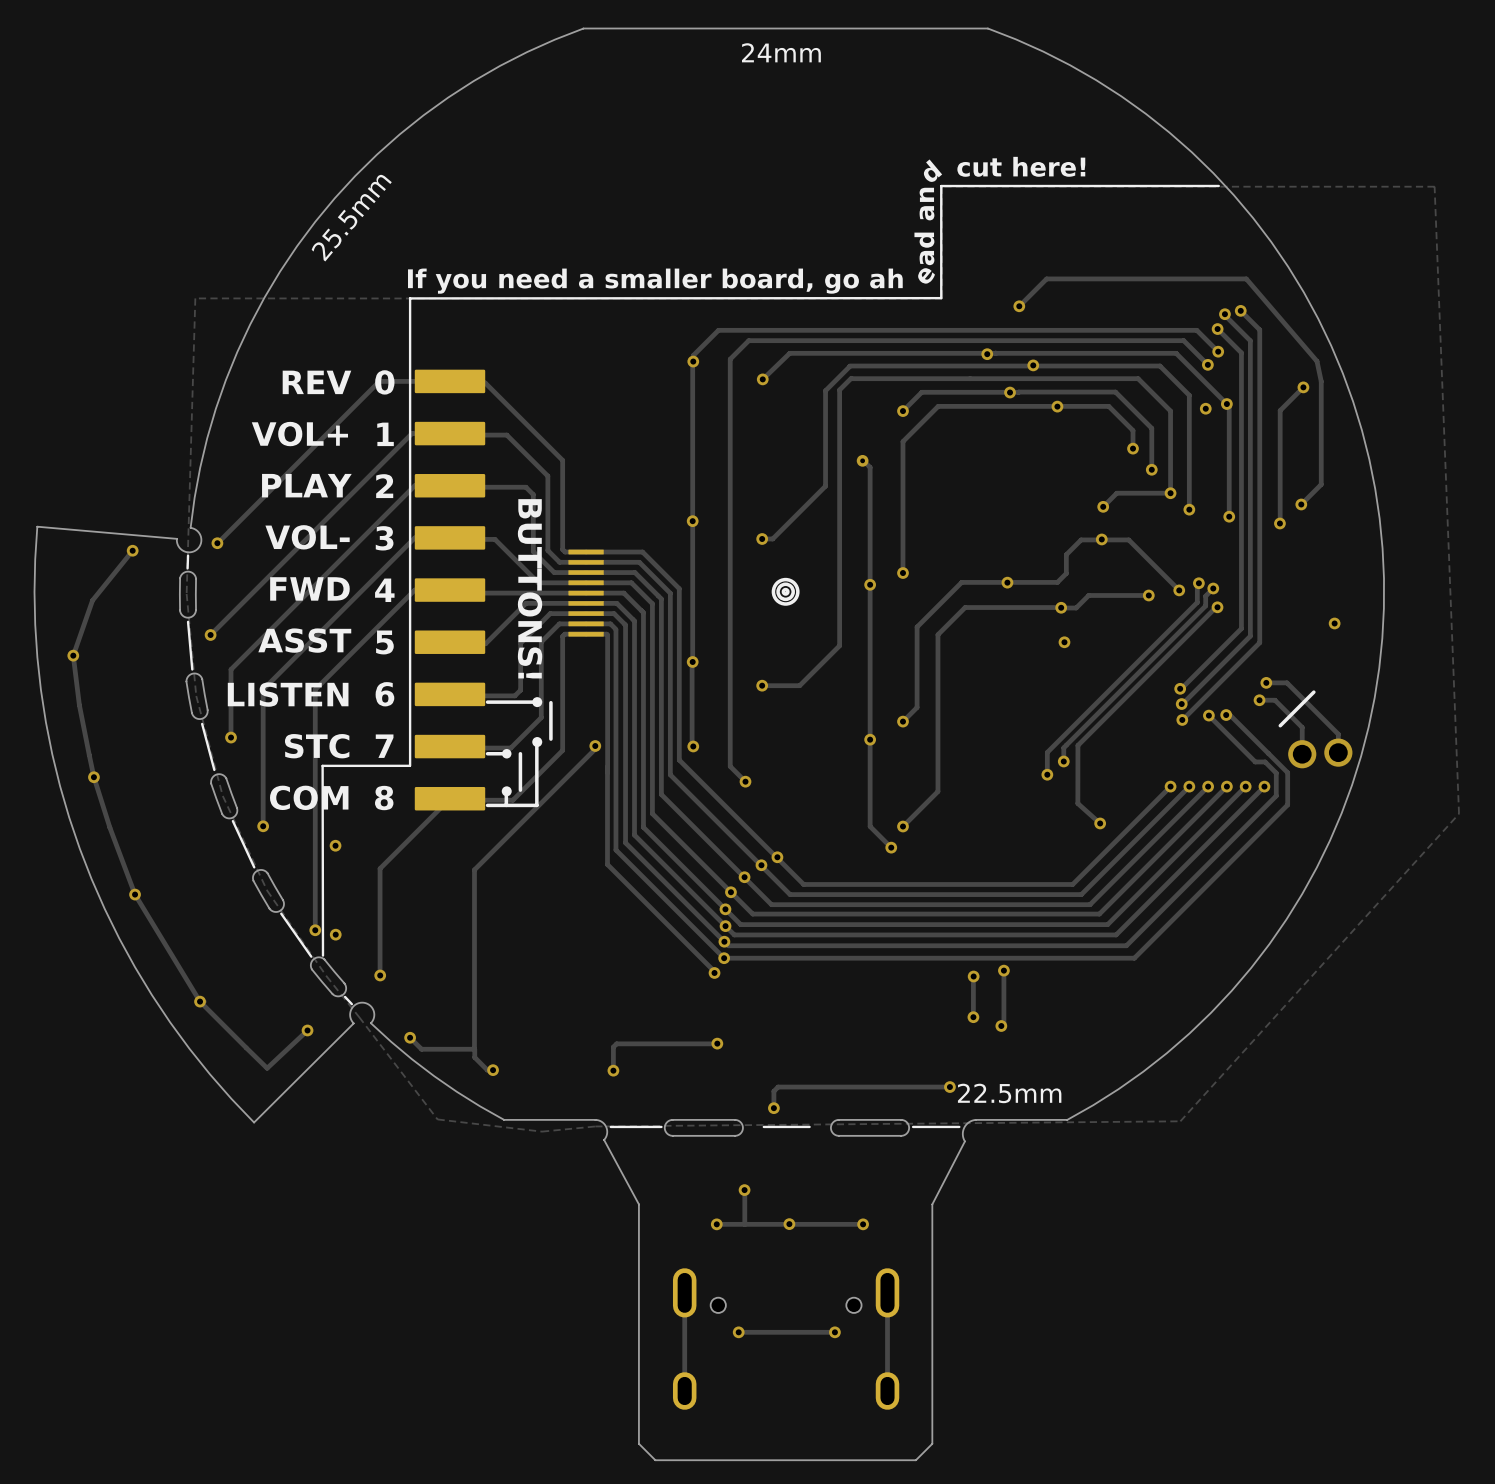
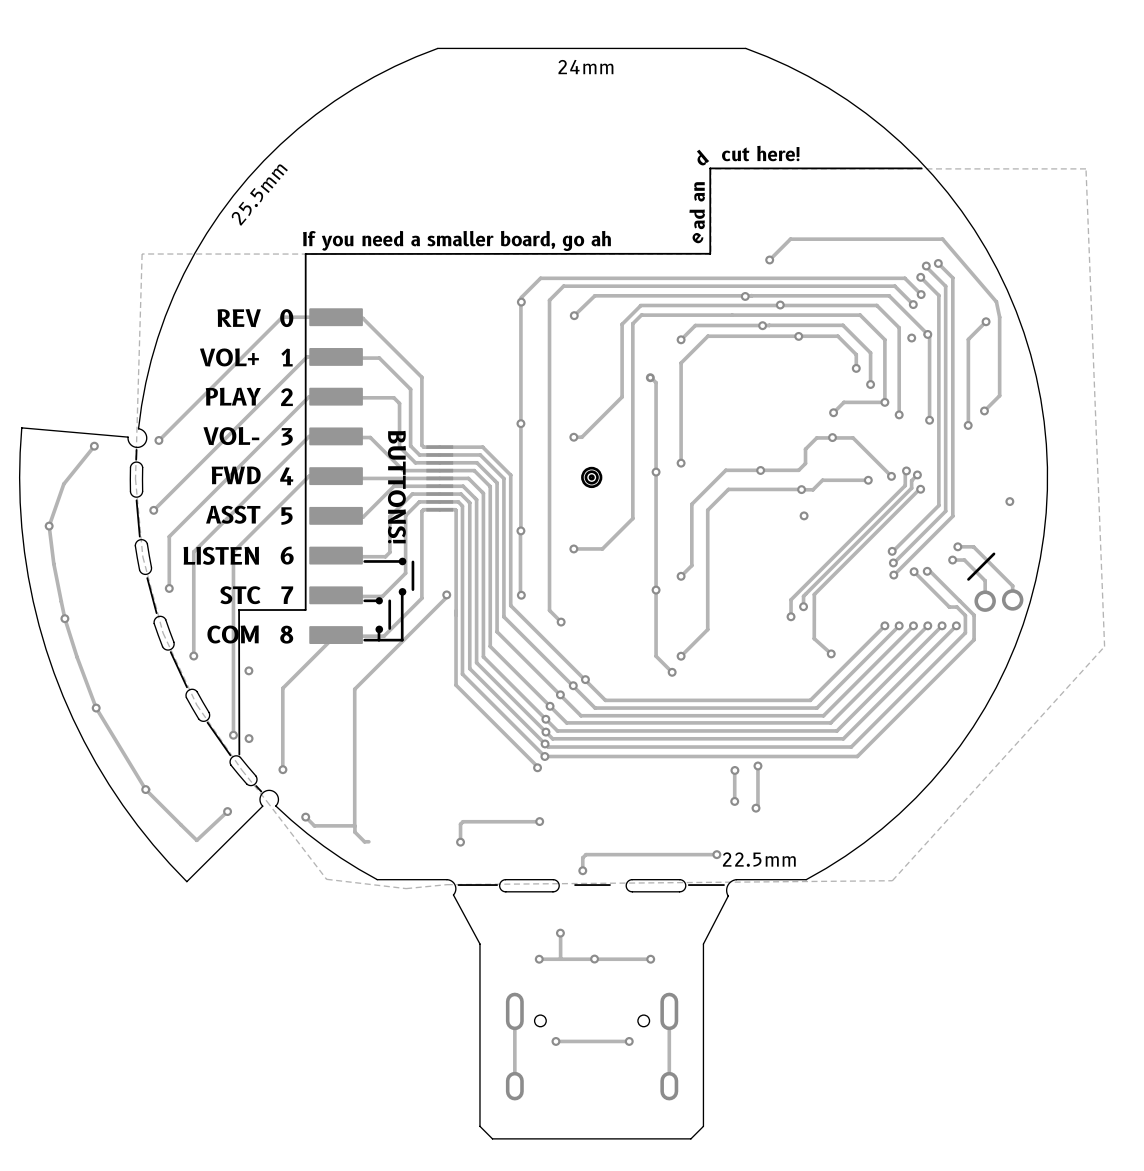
via: (493, 1070) -> none

